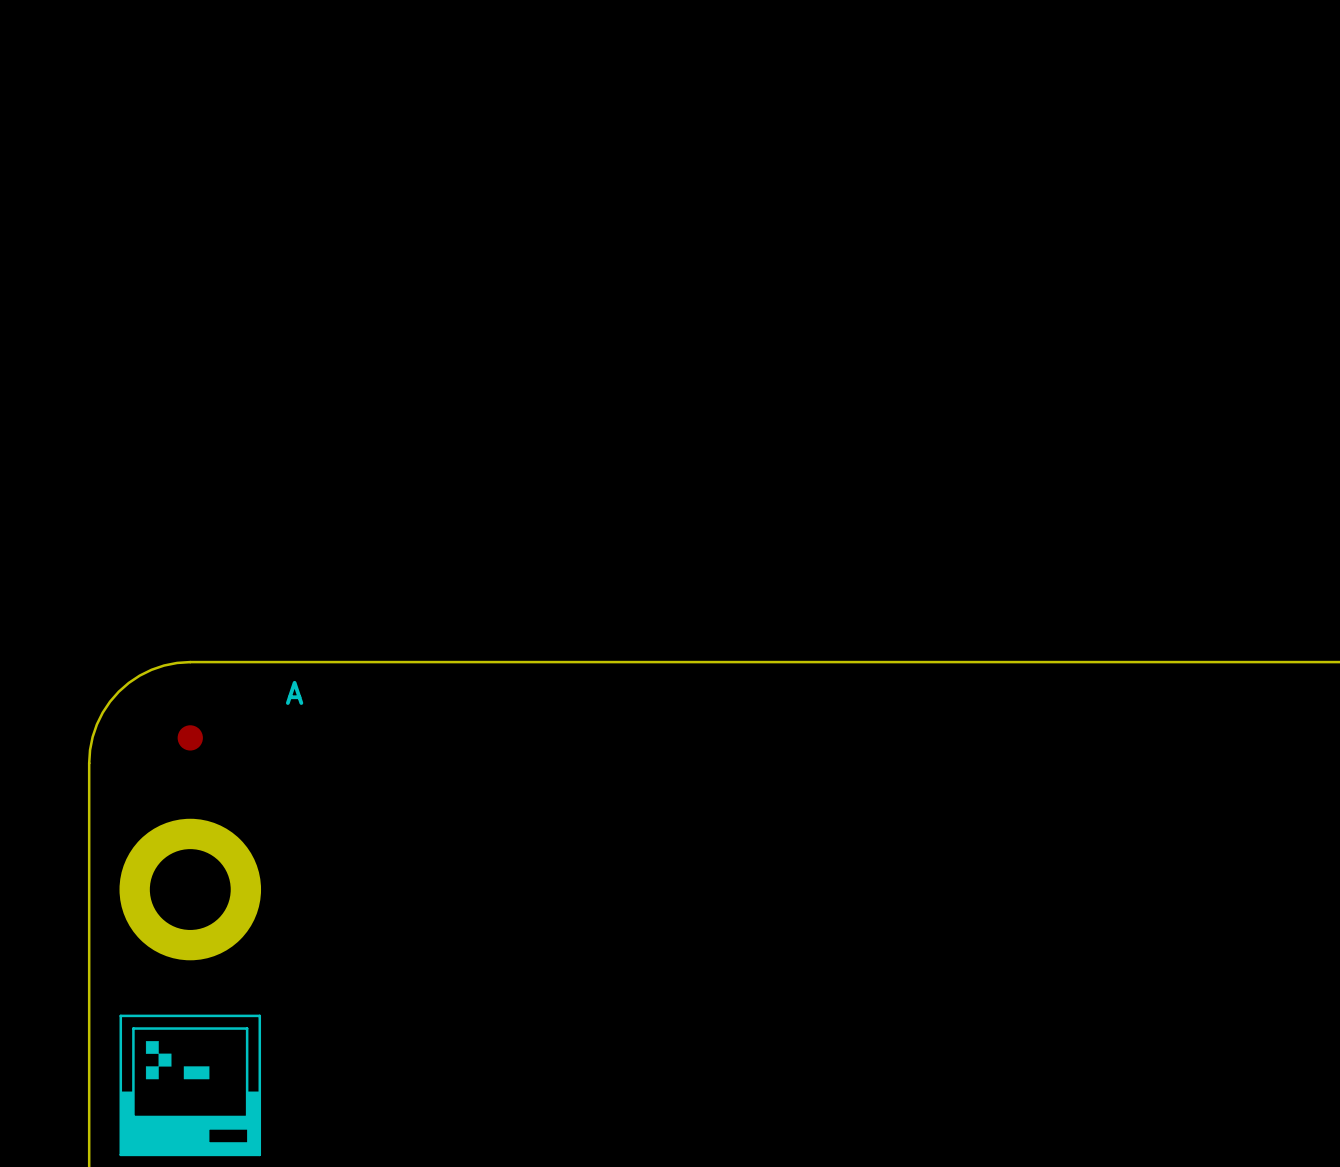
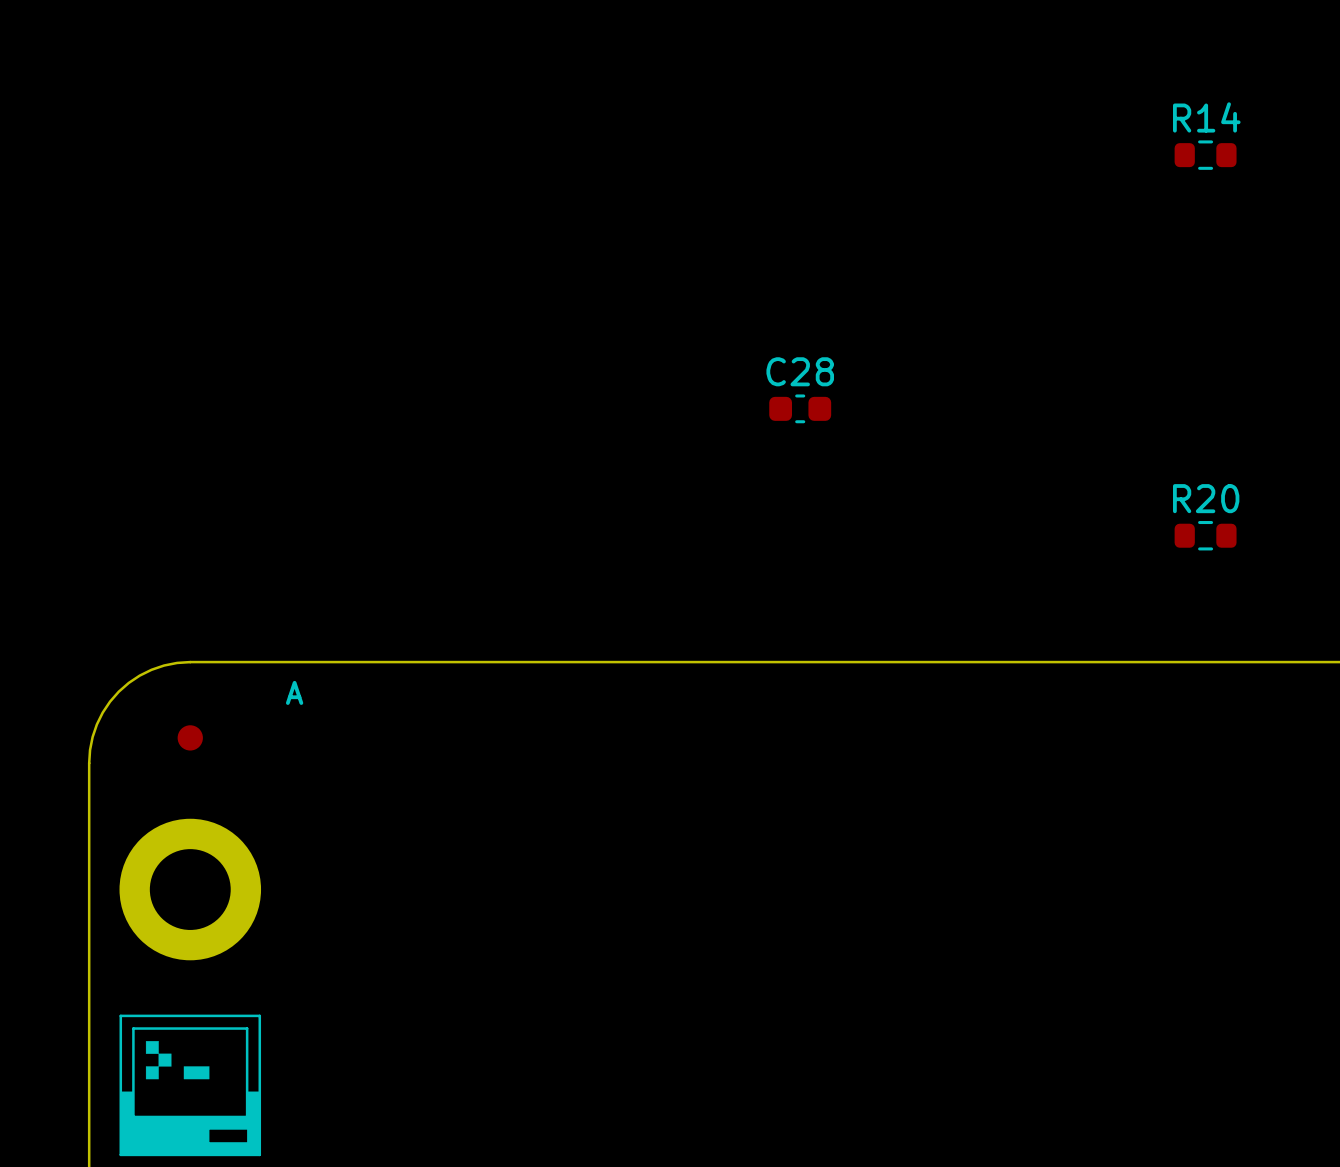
R14: none -> (1205, 155)
C28: none -> (800, 408)
R20: none -> (1205, 535)

